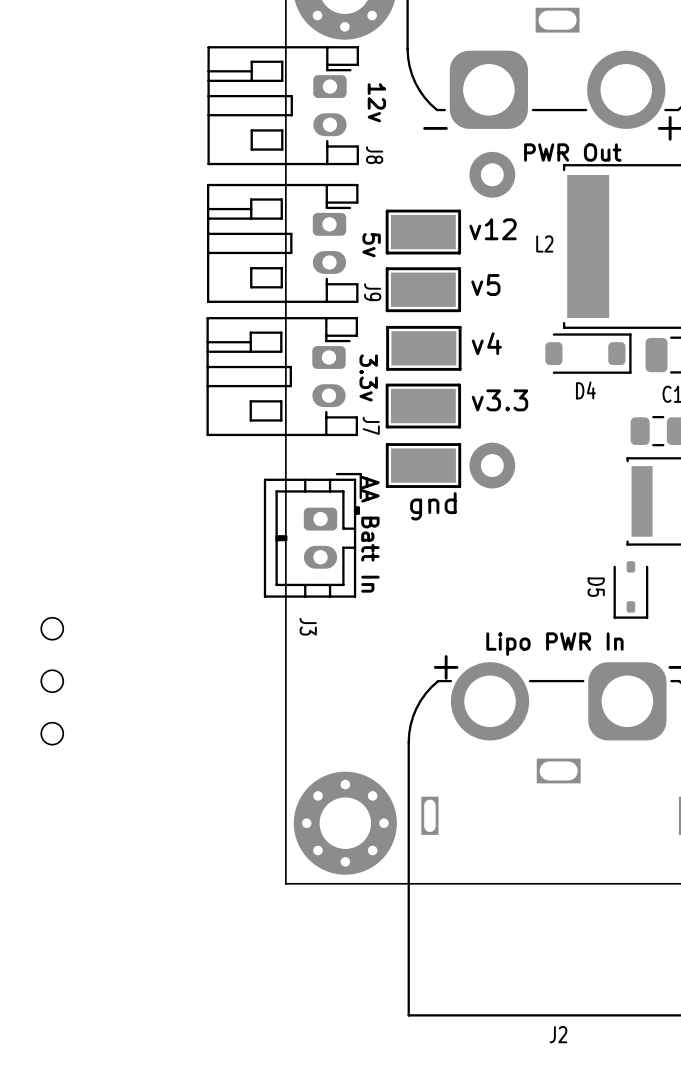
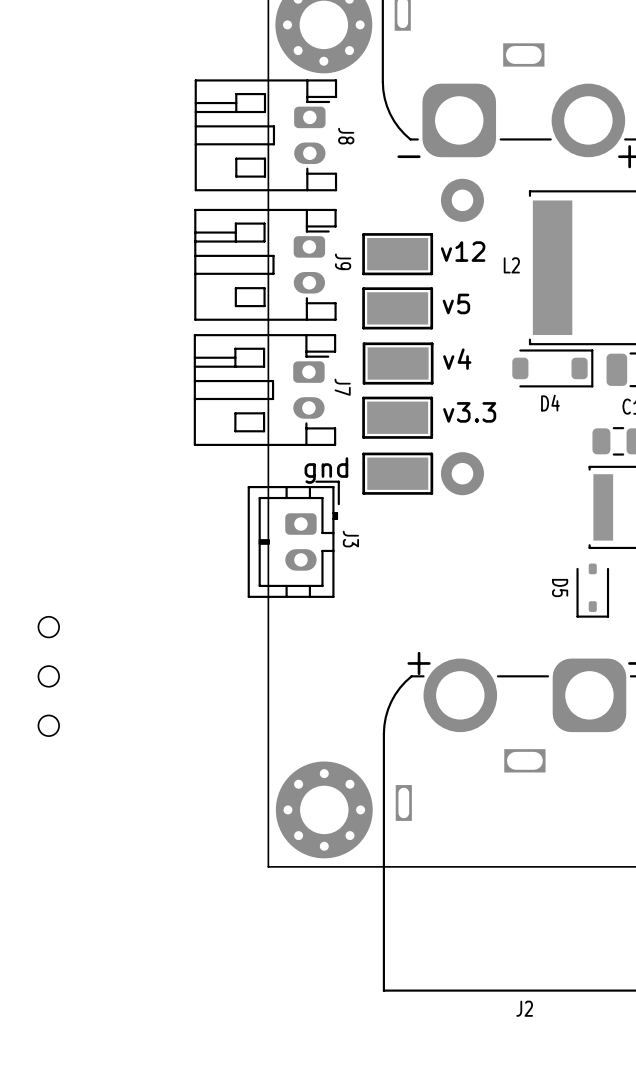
text: 12v (376, 102) -> none
text: PWR Out (572, 152) -> none
J8 name position: J8 (374, 155) -> J8 (346, 136)
text: 5v (371, 245) -> none
J9 name position: J9 (372, 292) -> J9 (343, 261)
text: 3.3v (368, 377) -> none
J7 name position: J7 (371, 425) -> J7 (342, 387)
text position: gnd (433, 506) -> gnd (326, 470)
text: AA Batt In (370, 534) -> none
J3 name position: J3 (308, 626) -> J3 (350, 539)
text: Lipo PWR In (554, 644) -> none

